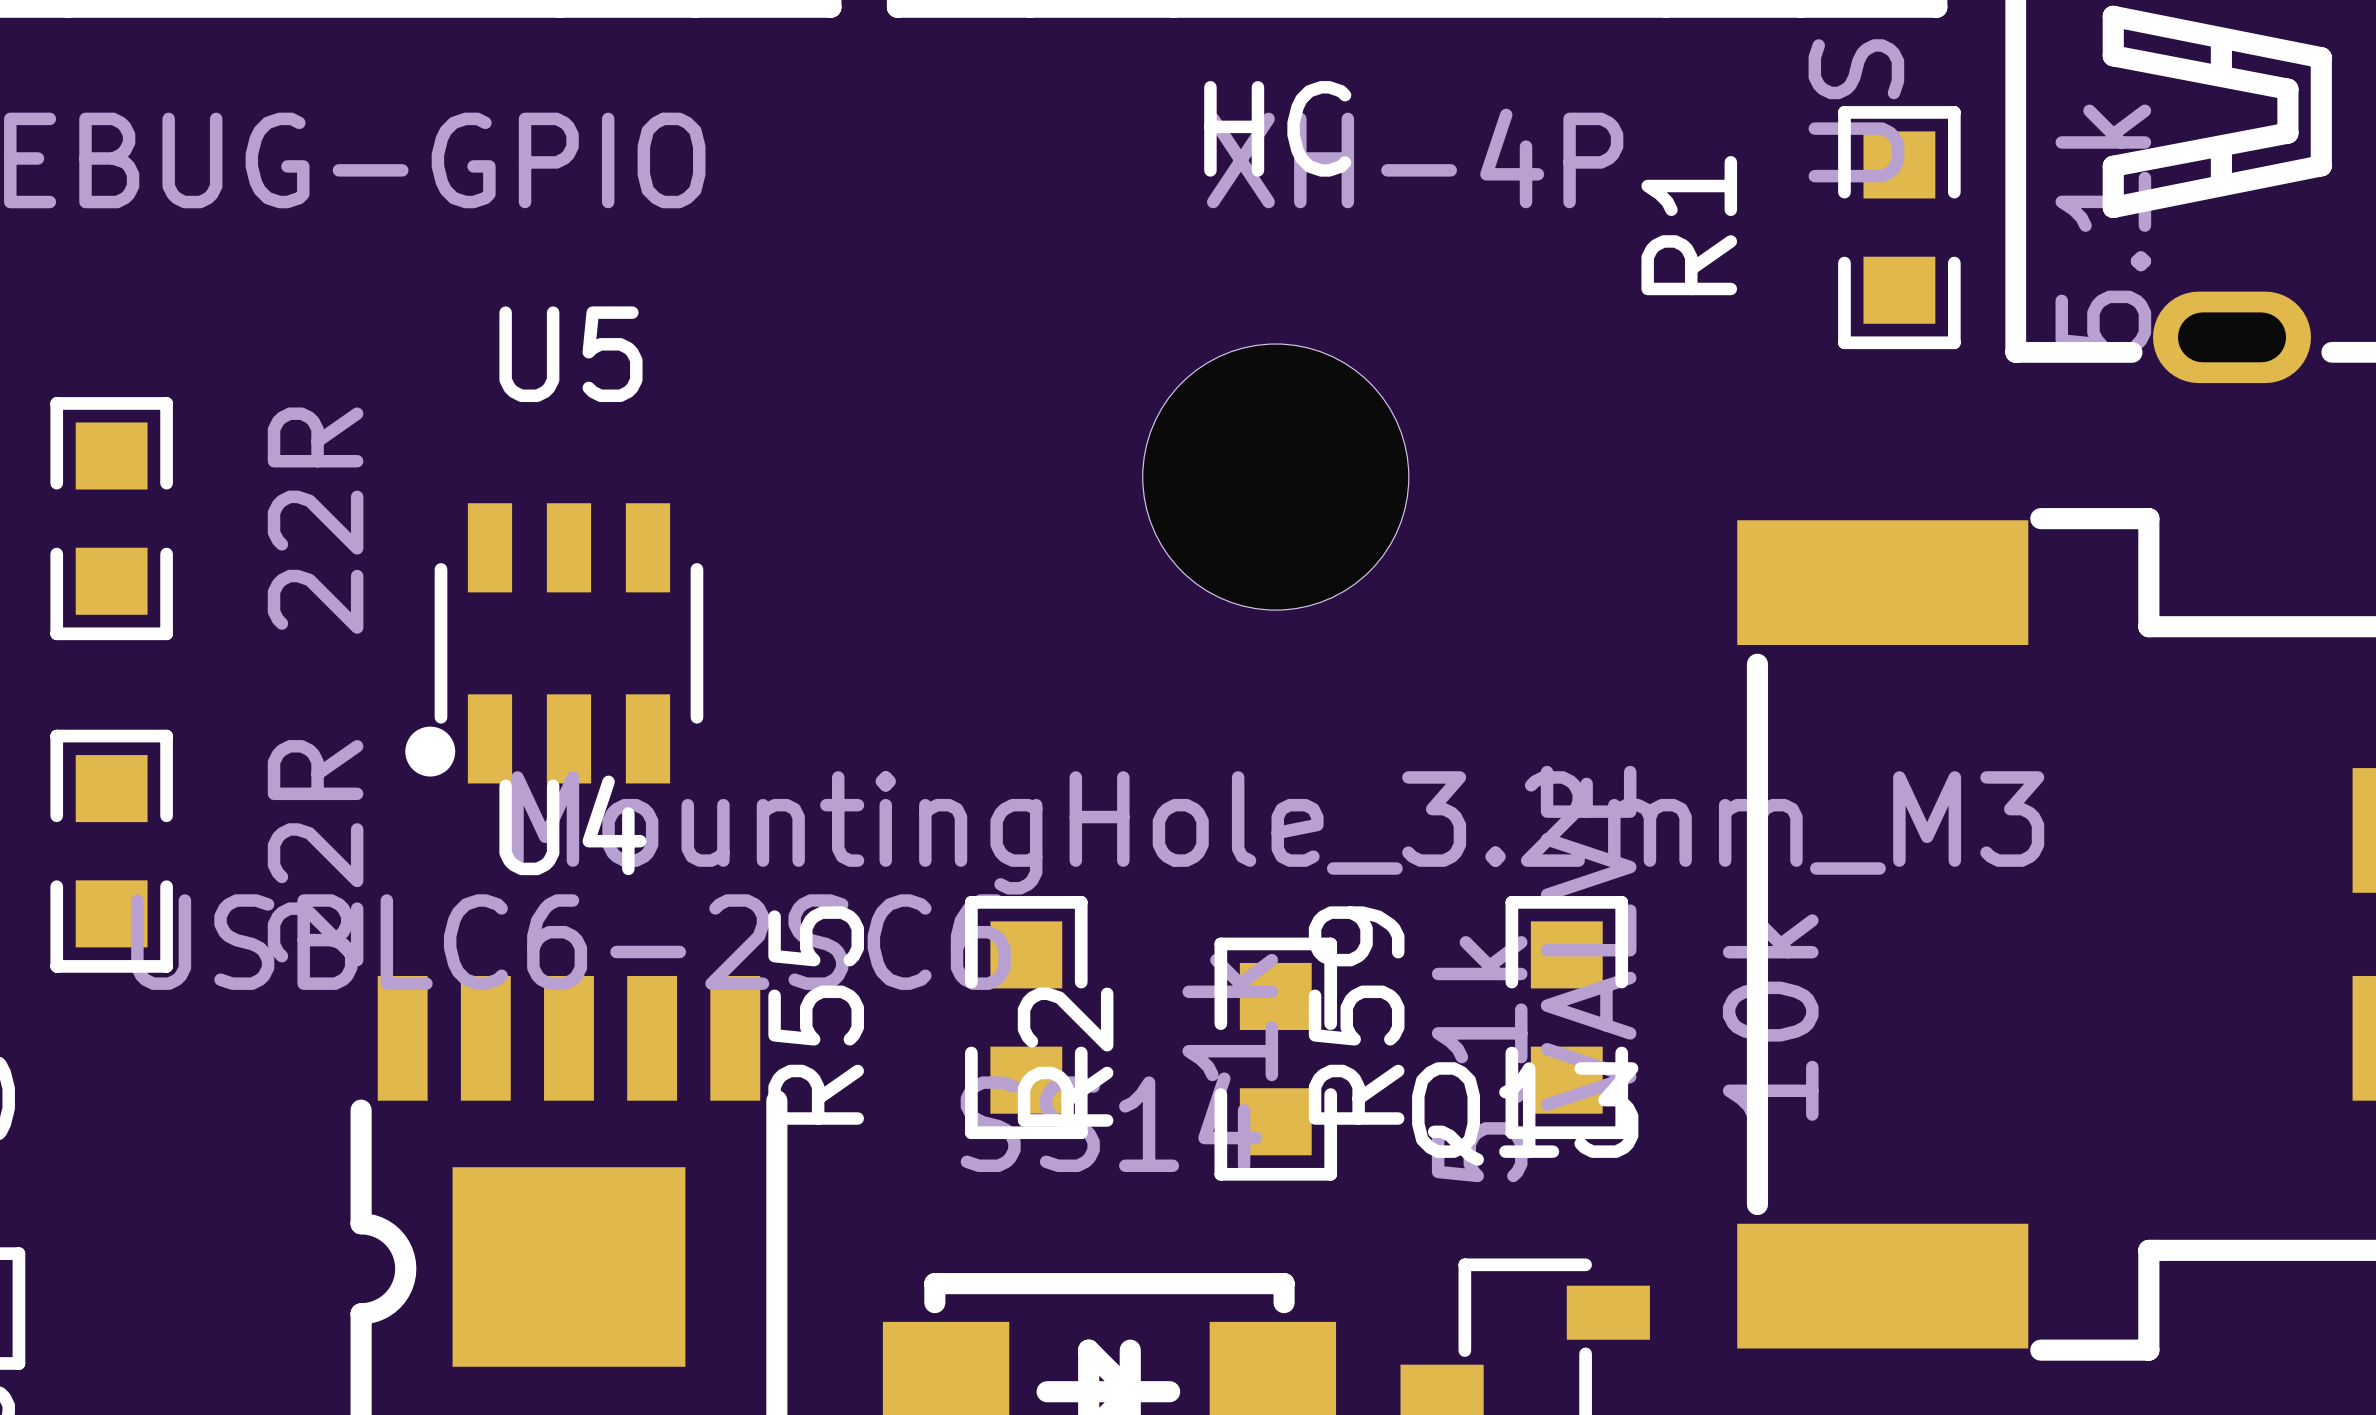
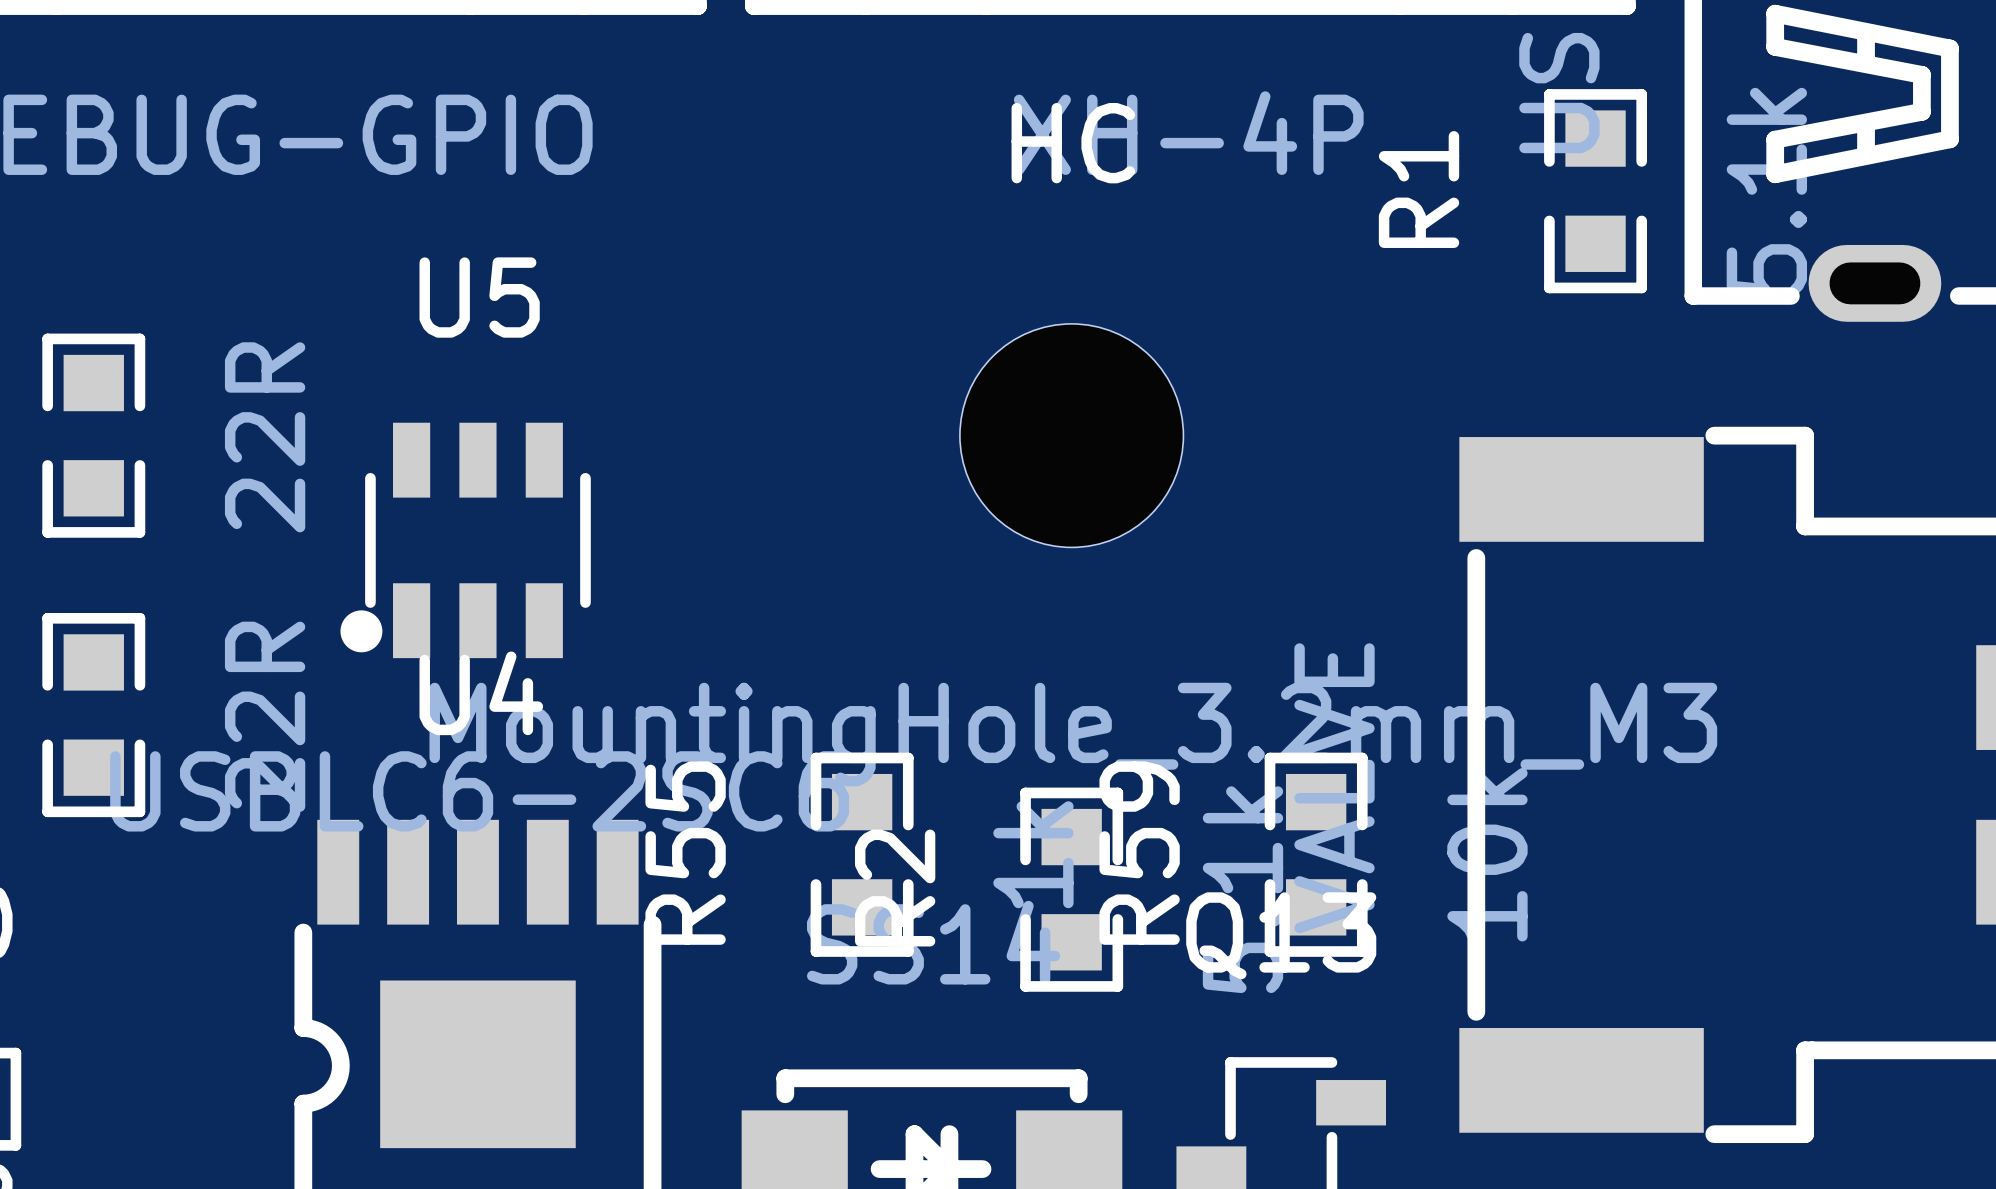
HC position: (1275, 477) -> (1071, 435)

